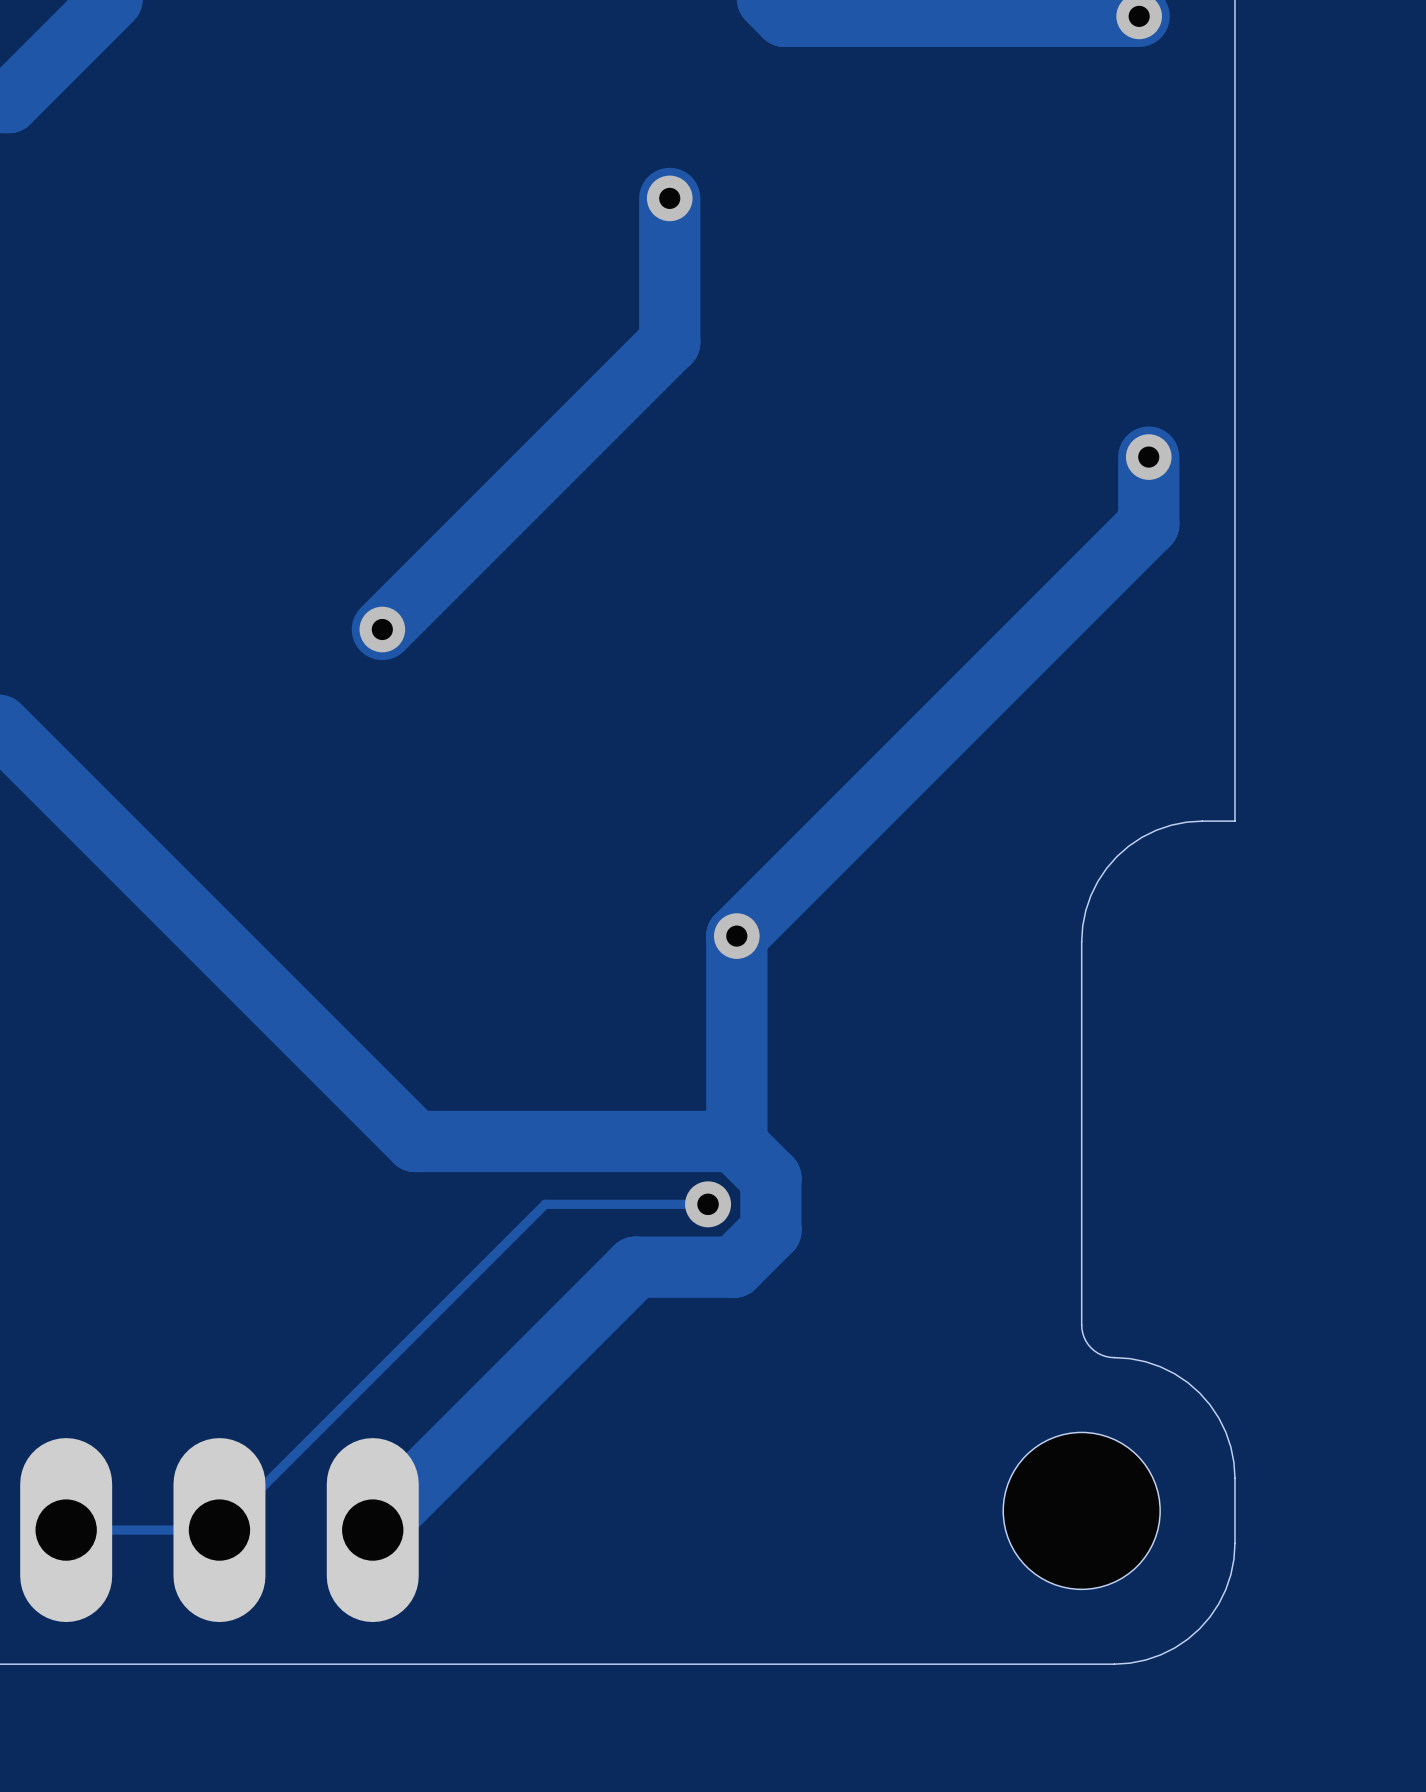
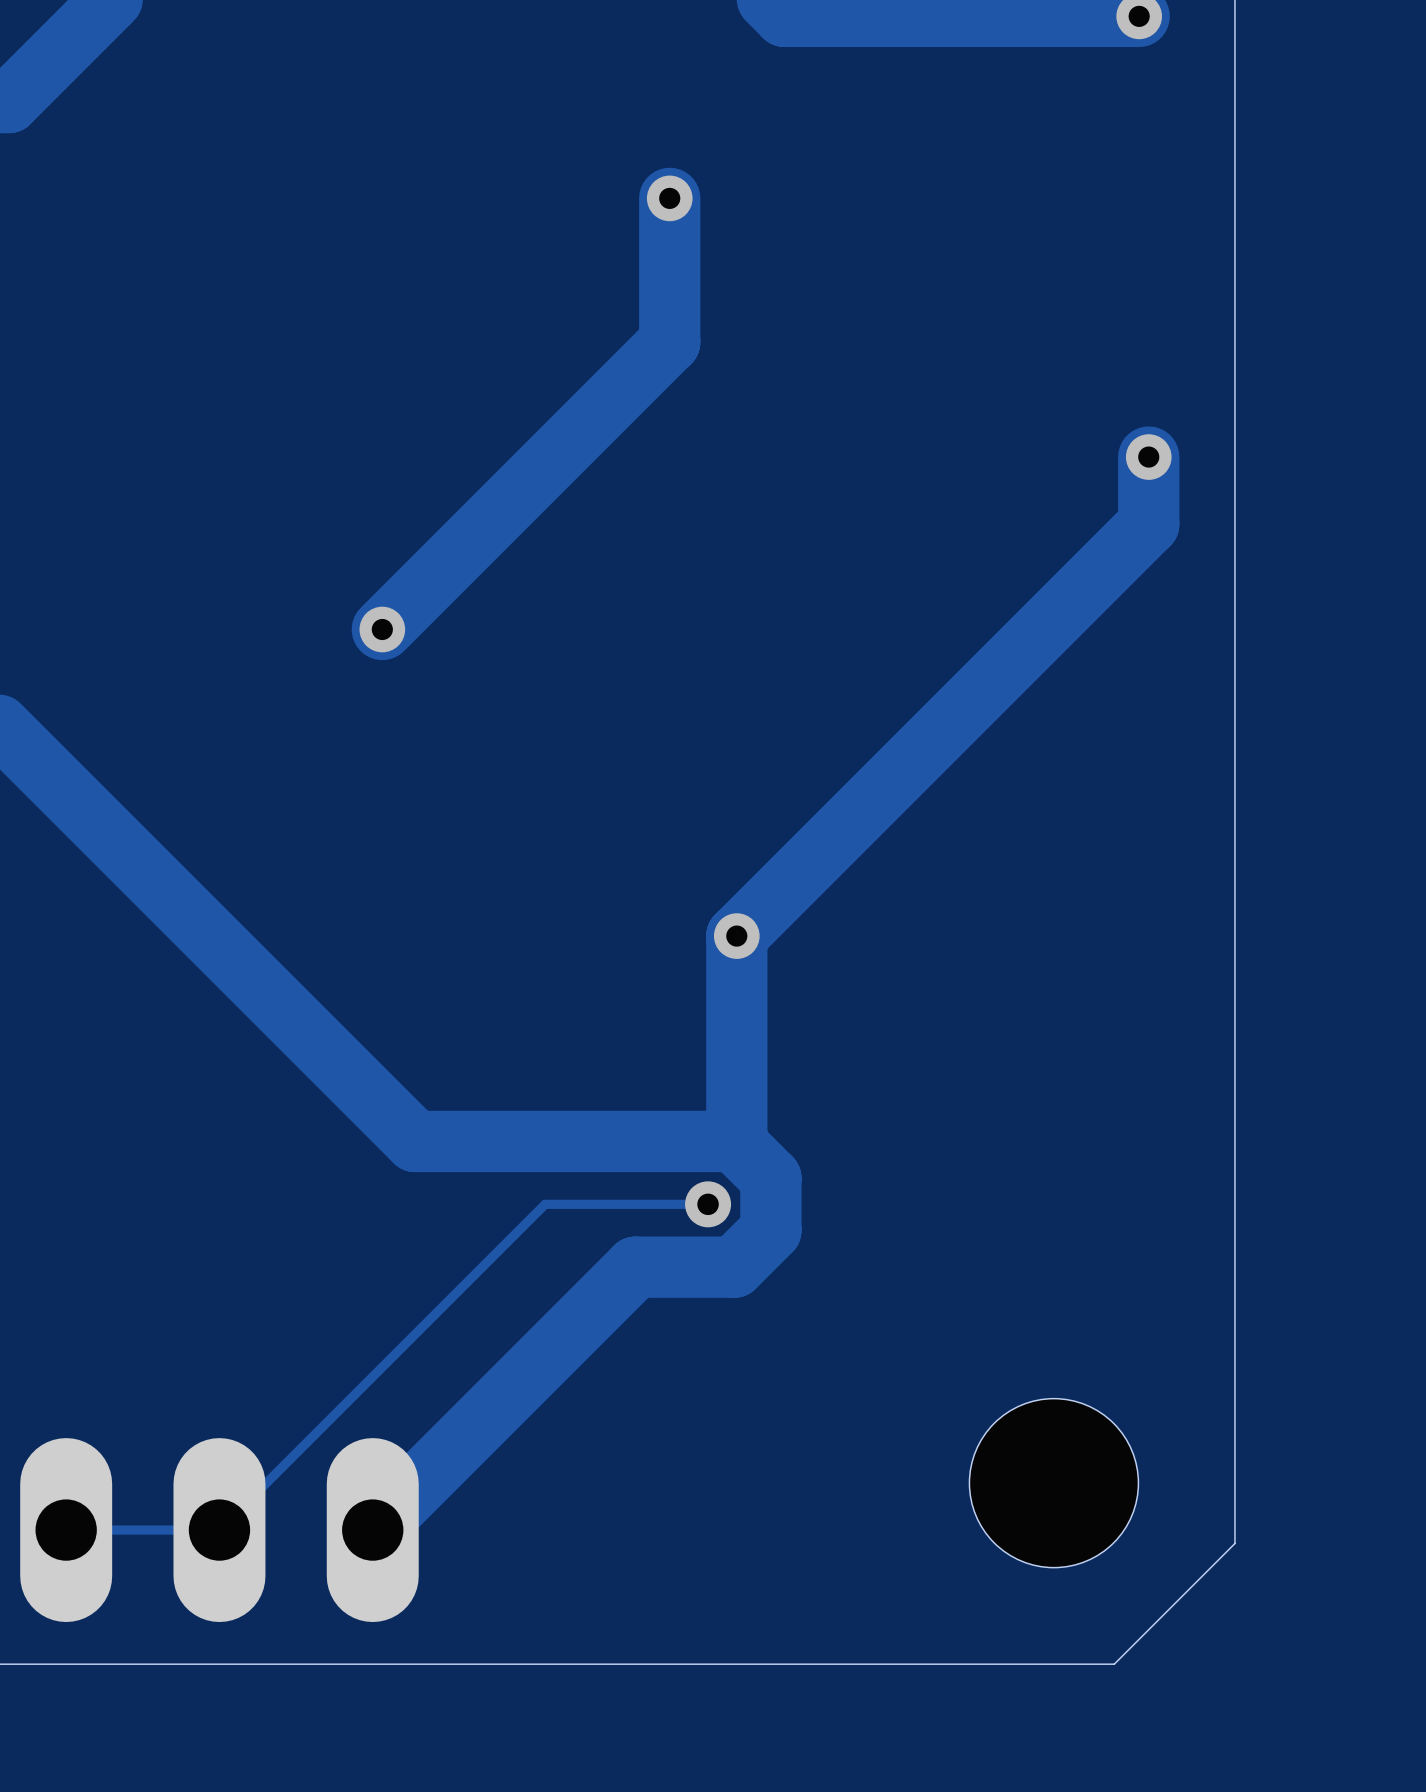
board edge: (1234, 821) (1202, 821) (1171, 825) (1142, 837) (1128, 846) (1106, 868) (1090, 895) (1085, 910) (1081, 941) (1082, 1333) (1088, 1344) (1097, 1353) (1110, 1357) (1145, 1361) (1160, 1366) (1174, 1373) (1199, 1392) (1218, 1417) (1225, 1432) (1230, 1447) (1234, 1478) -> (1234, 821) (1234, 1478)
hole position: (1081, 1510) -> (1053, 1483)
board edge: (1234, 1543) (1230, 1574) (1225, 1589) (1218, 1603) (1199, 1628) (1174, 1648) (1160, 1655) (1145, 1660) (1114, 1664) -> (1234, 1543) (1114, 1664)

